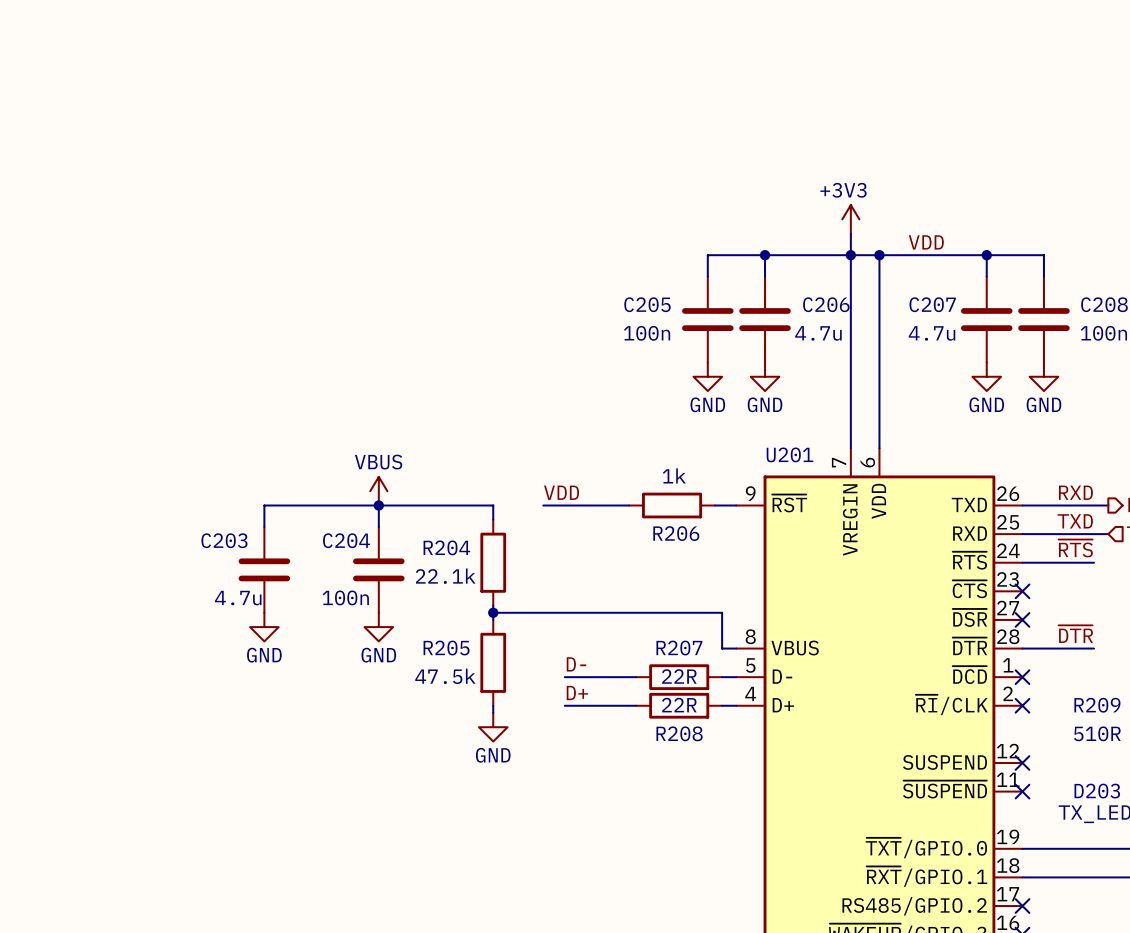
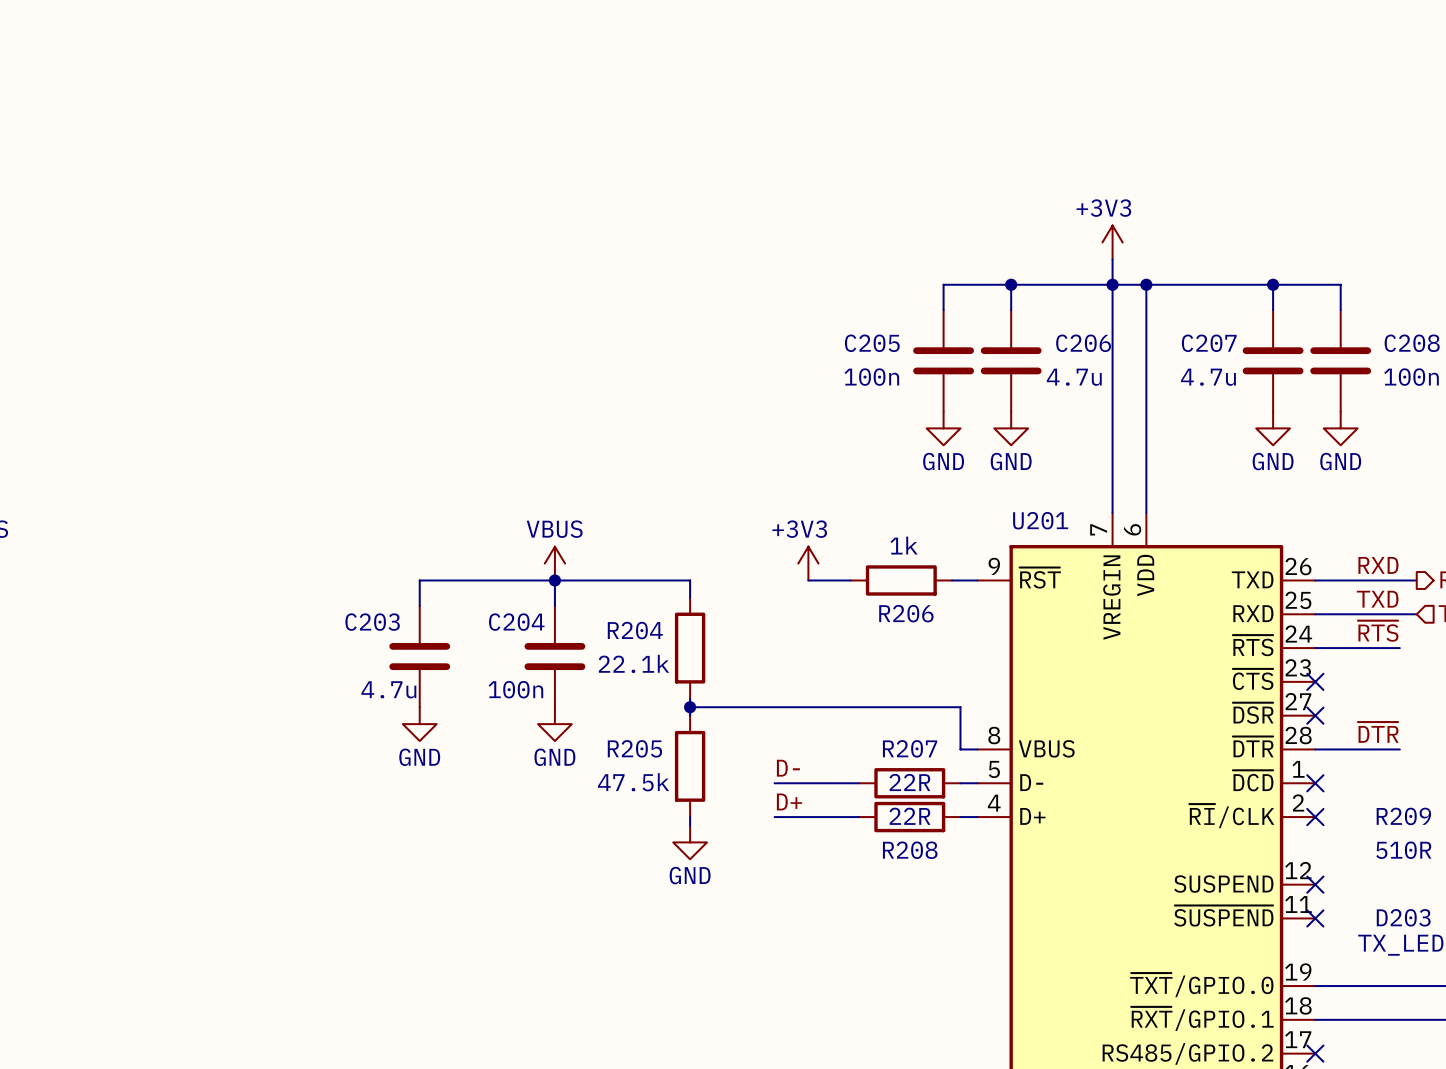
label: VDD (926, 242) -> none
power symbol: none -> +3V3 (808, 563)
label: VDD (561, 492) -> none
wire: (543, 505) (593, 505) -> none

